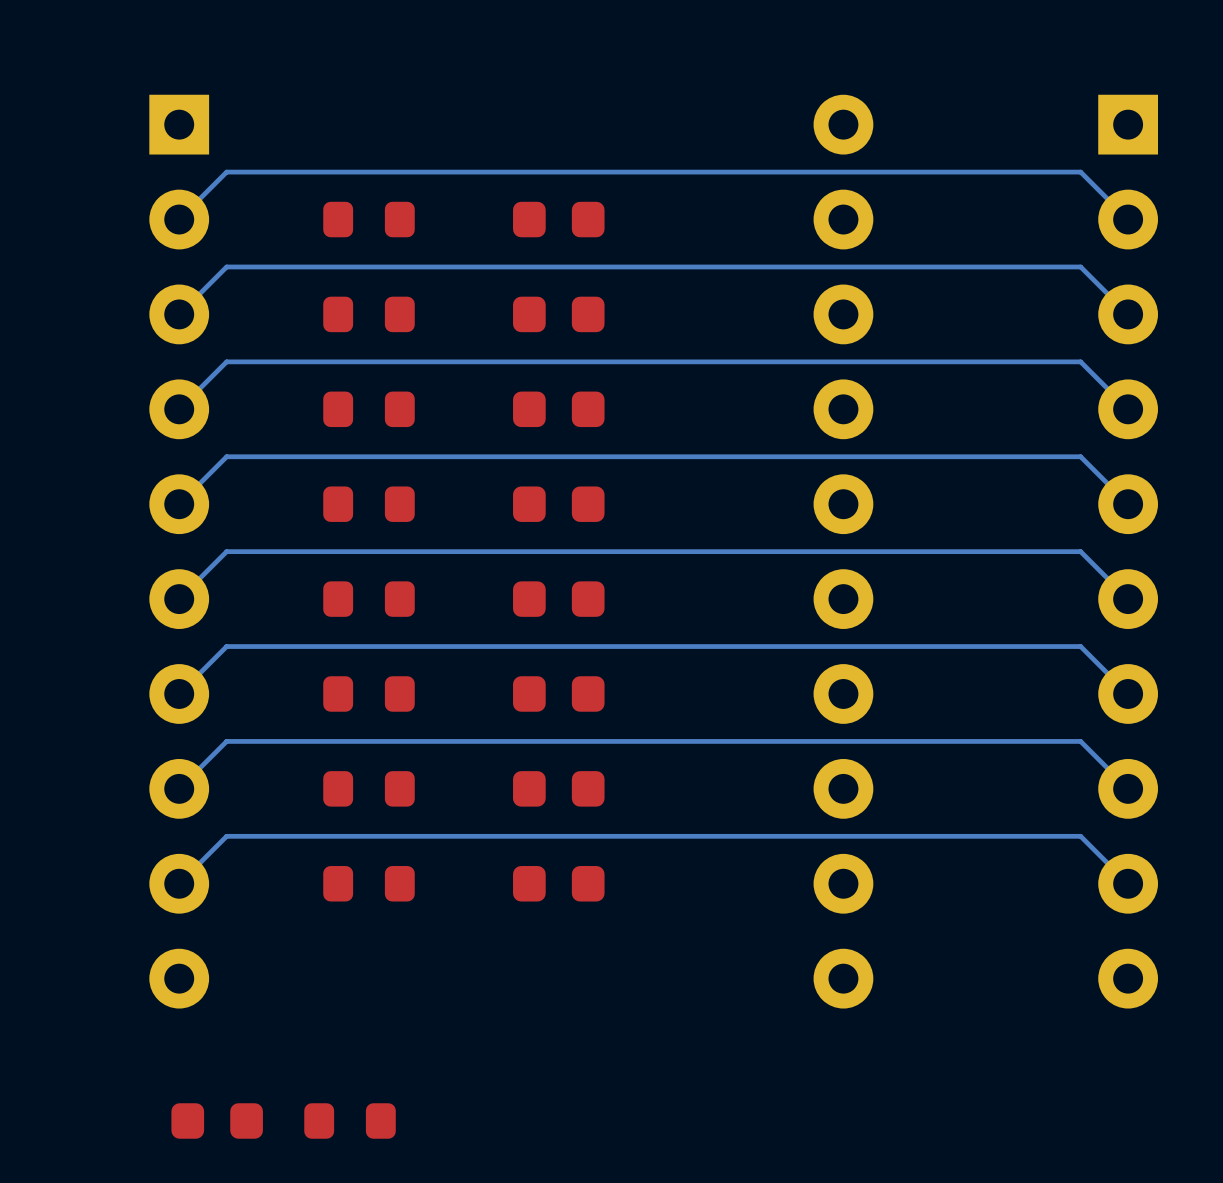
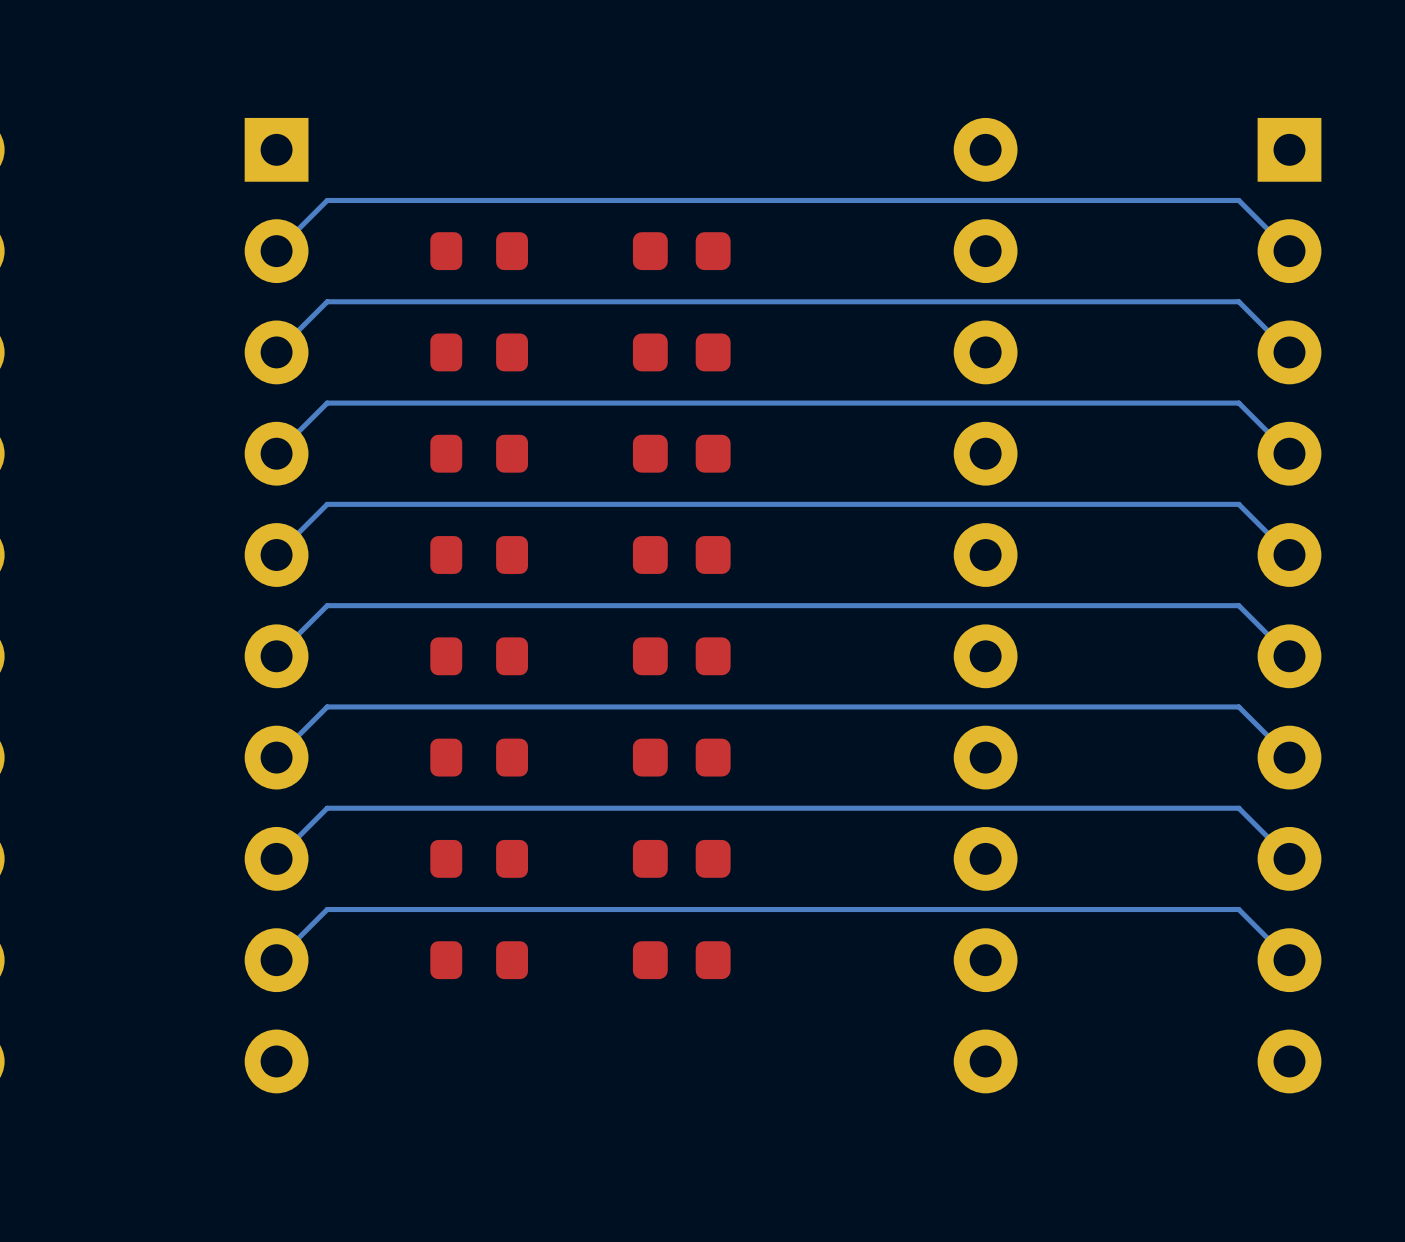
part: (217, 1120) -> none
part: (350, 1120) -> none

